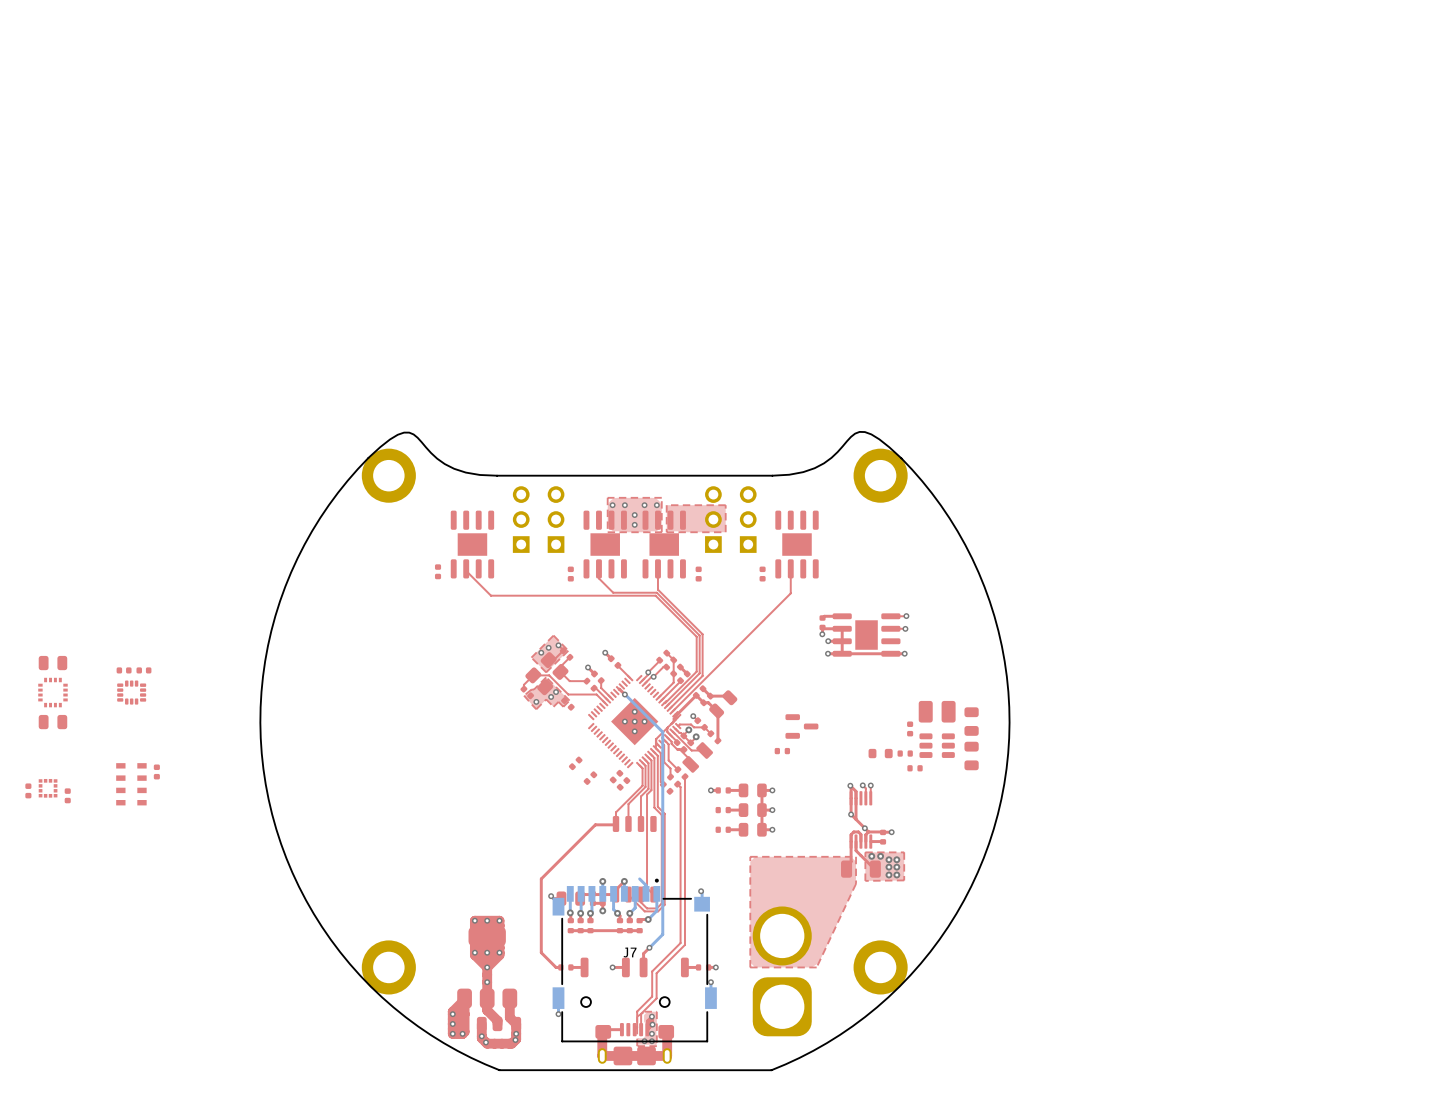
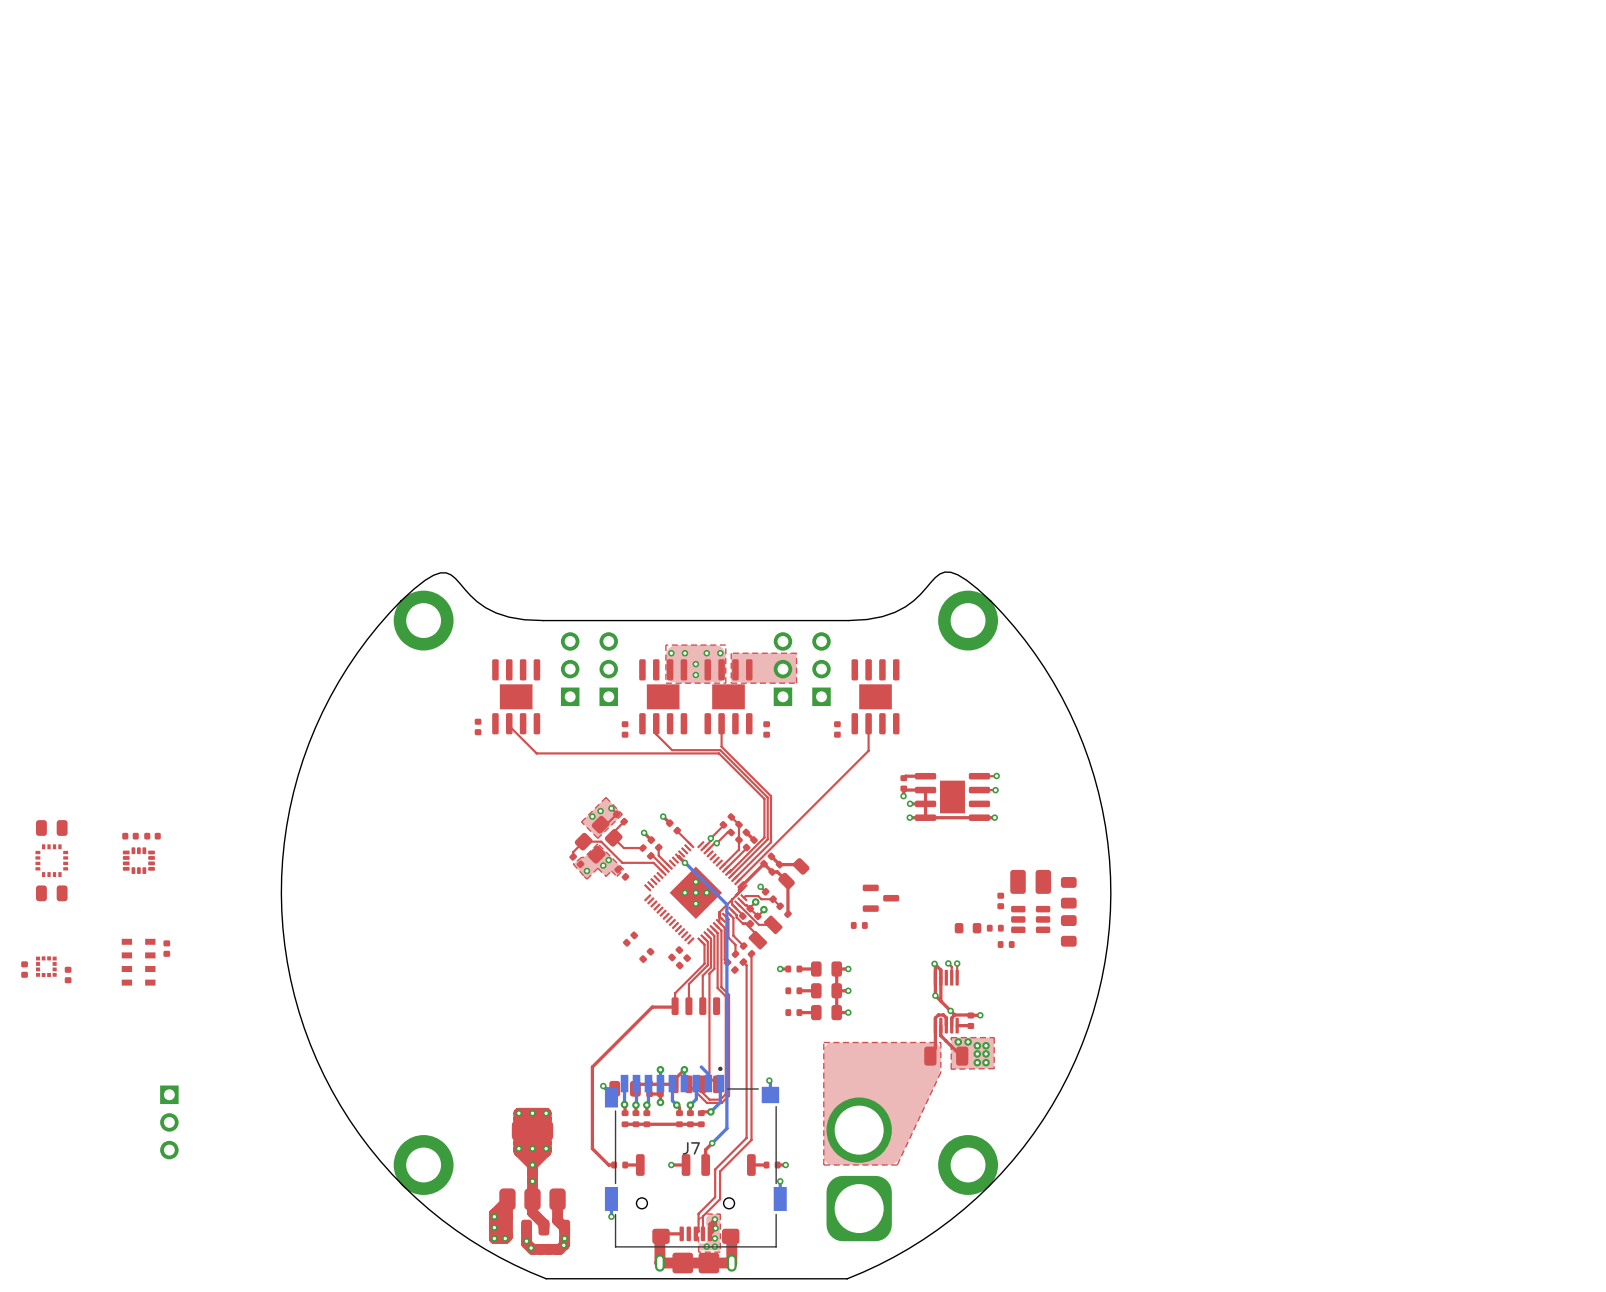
part: none -> (169, 1122)

